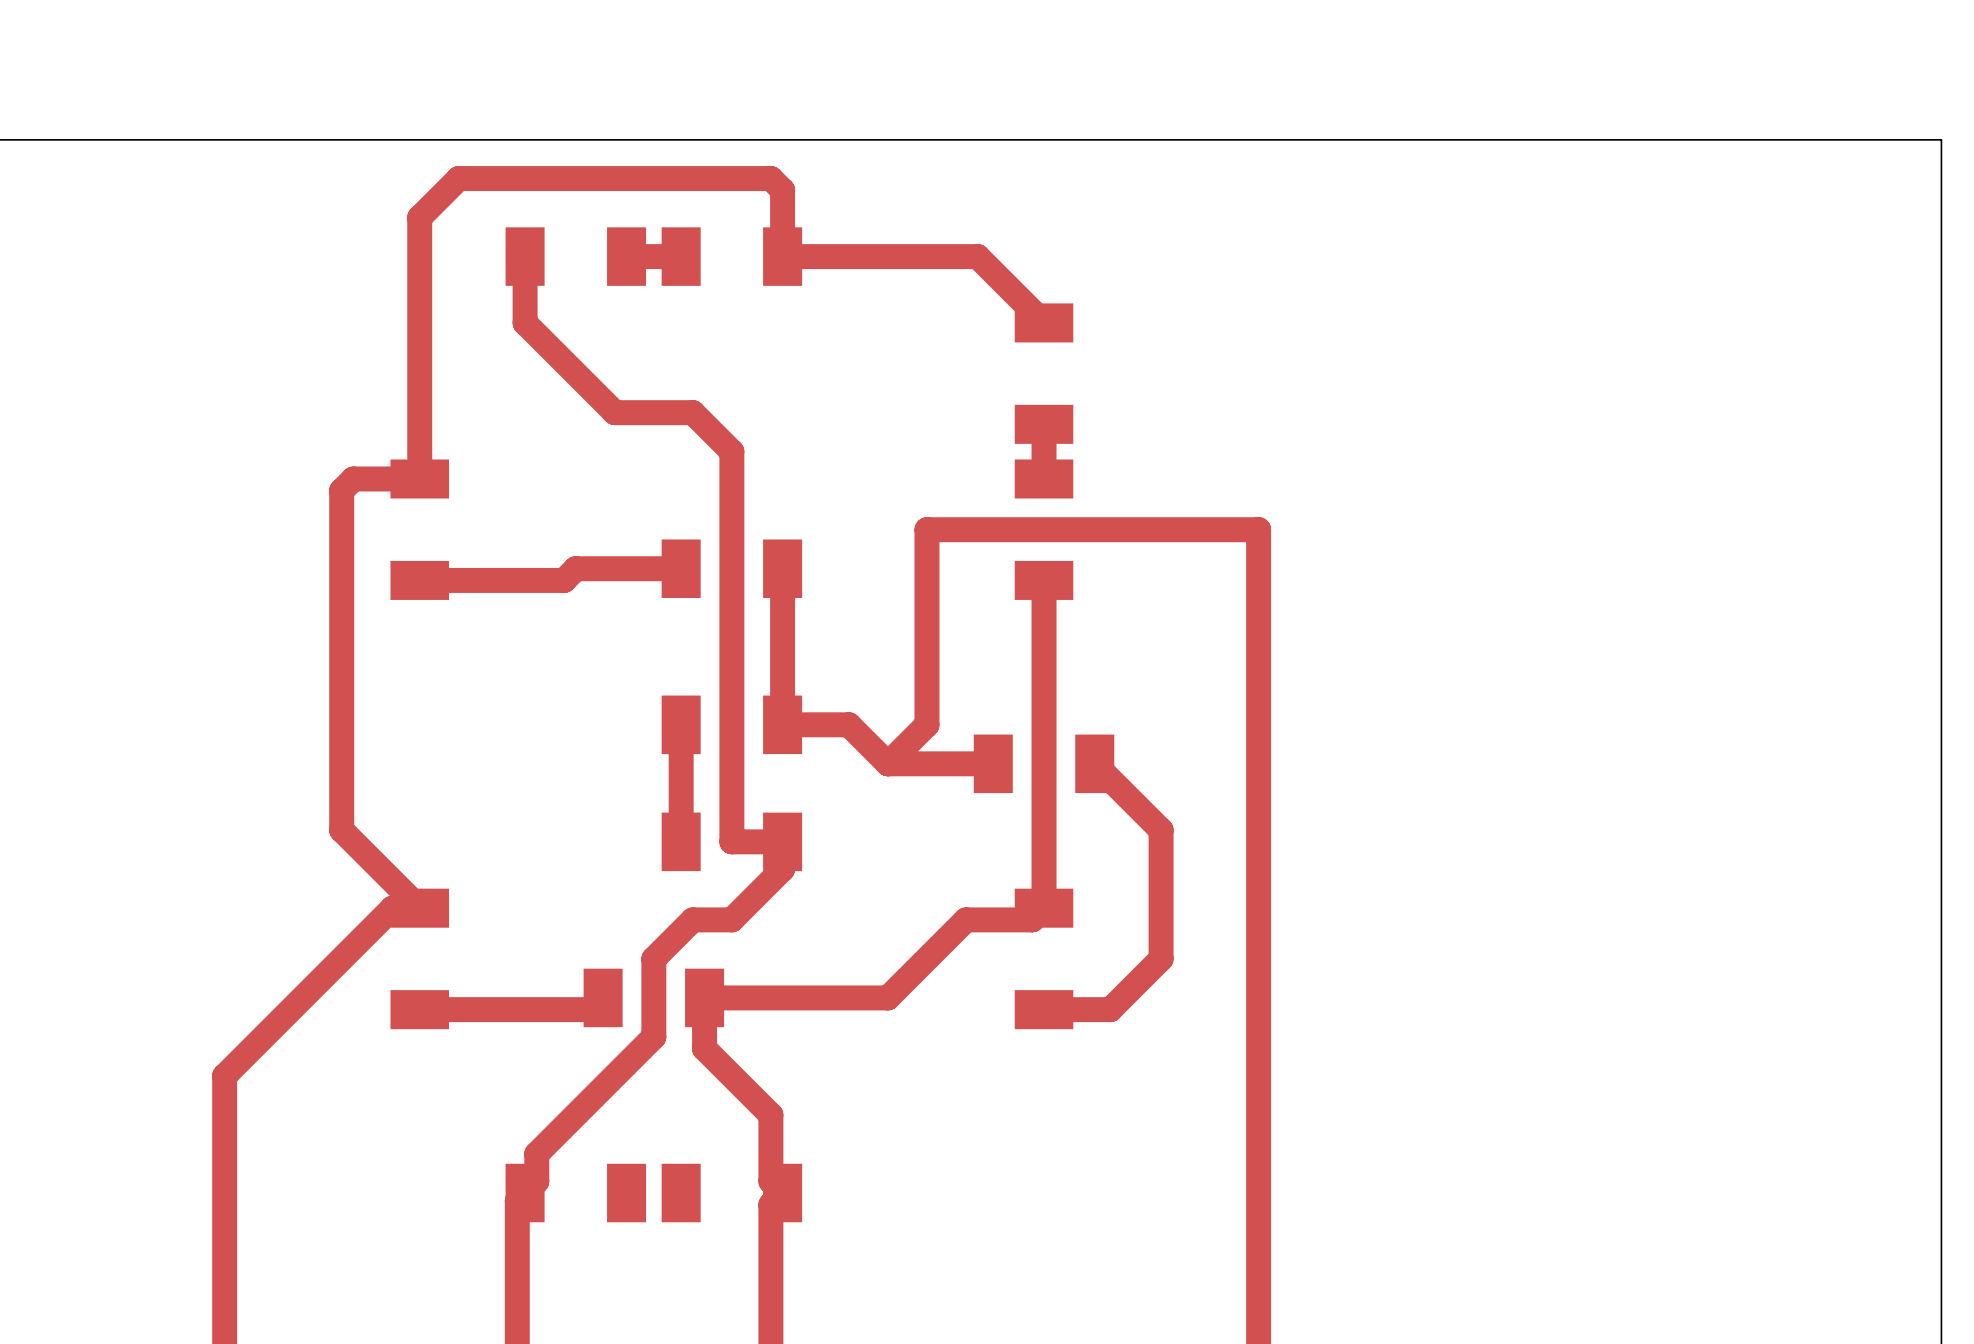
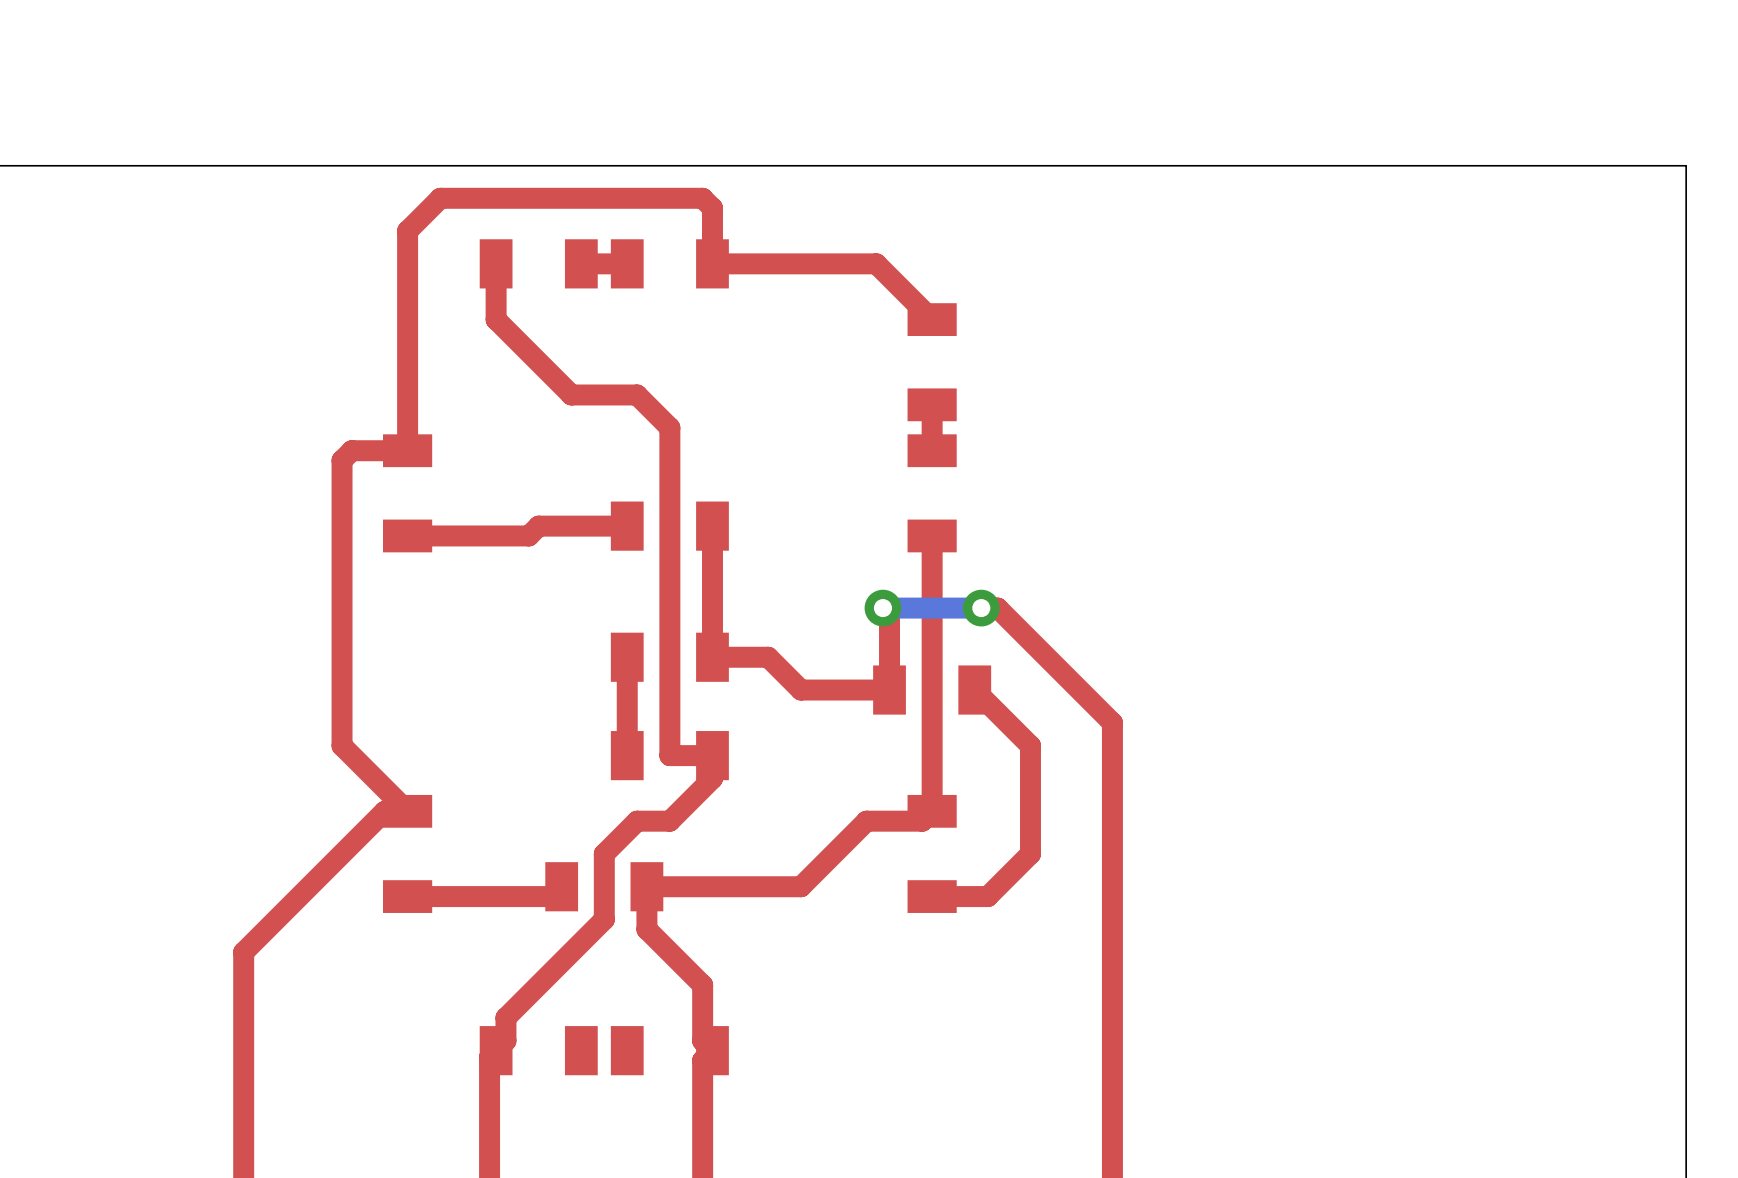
top track: none -> (882, 608) (889, 614) (889, 690)
via: none -> (882, 608)
bottom track: none -> (981, 608) (882, 608)
via: none -> (981, 608)
top track: (887, 763) (926, 724) (926, 529) (1258, 529) (1258, 802) -> (981, 608) (997, 608) (1112, 722)

